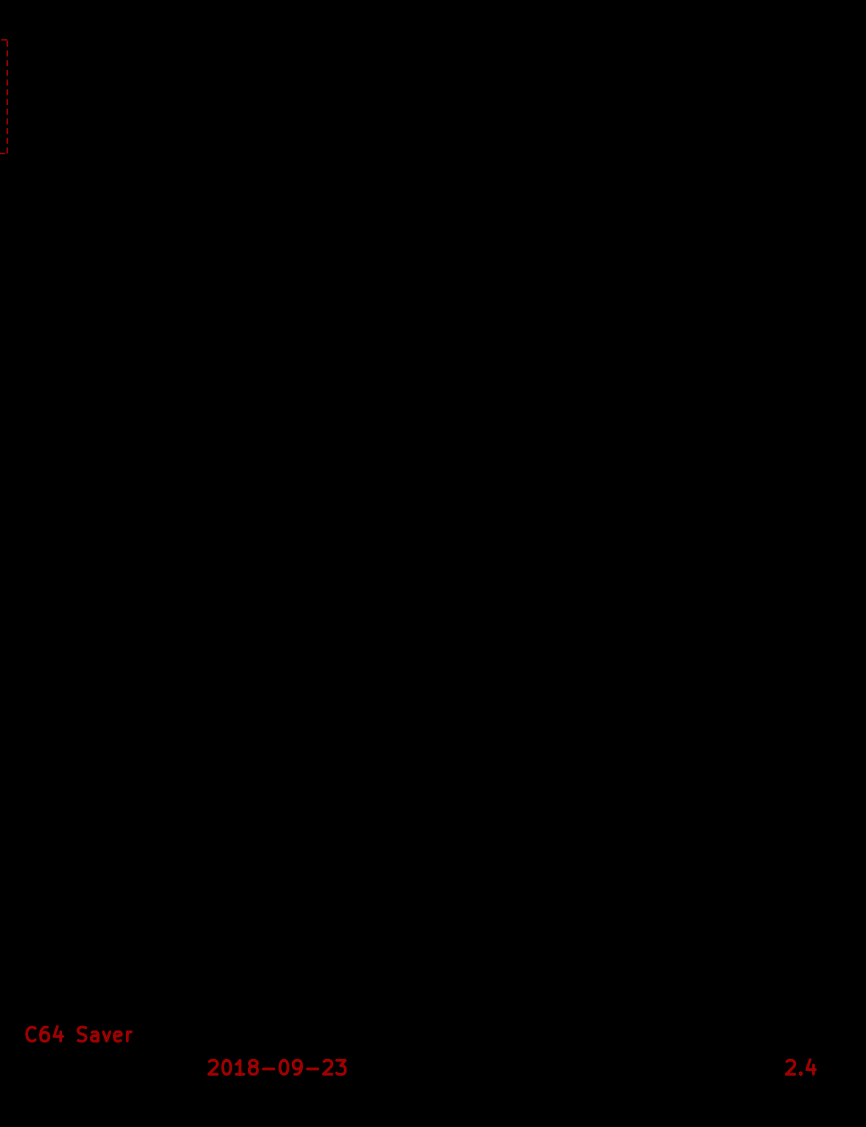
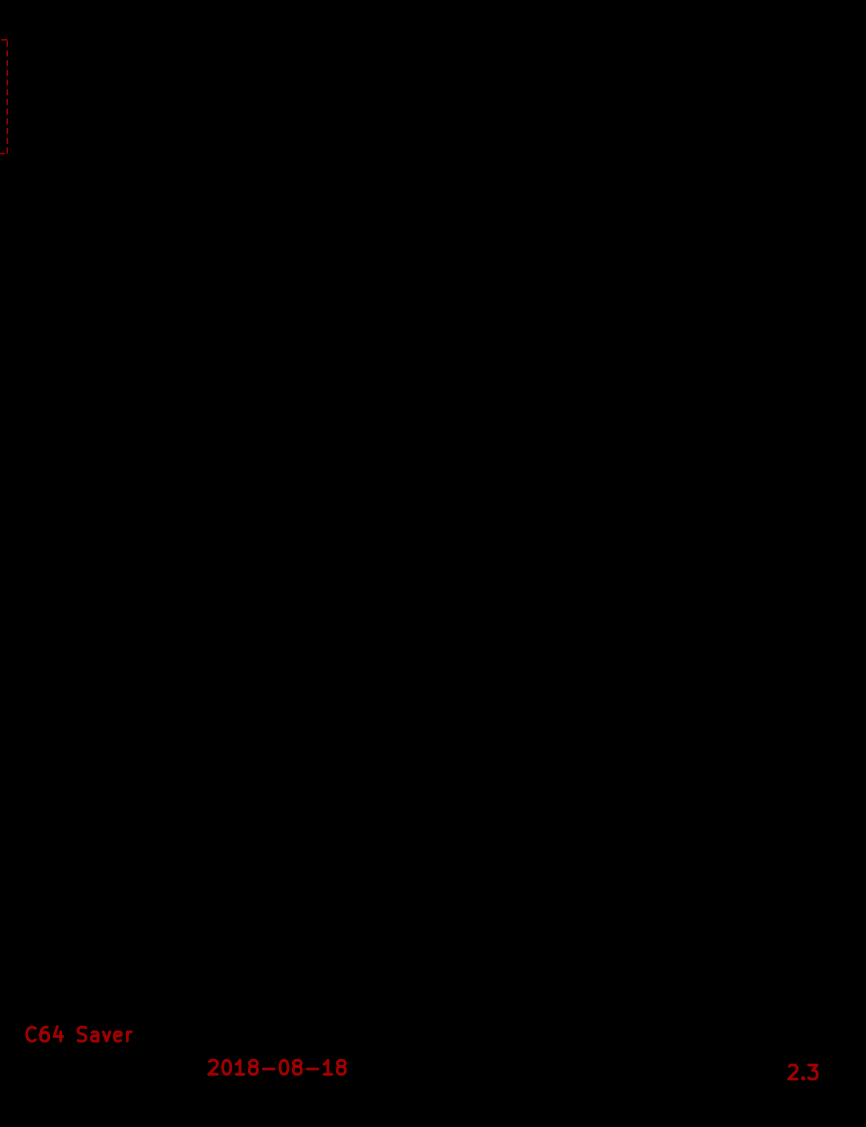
text: 2.4 (800, 1066) -> 2.3 (802, 1072)
text: 2018-09-23 (276, 1067) -> 2018-08-18 (276, 1067)

